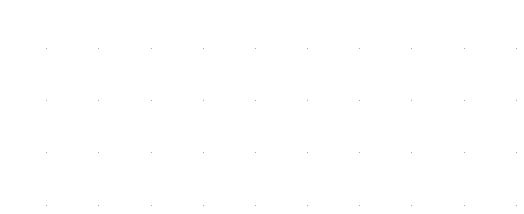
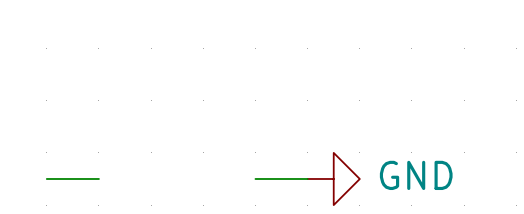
wire: none -> (46, 178) (98, 178)
wire: none -> (255, 178) (307, 178)
power symbol: none -> GND (333, 178)

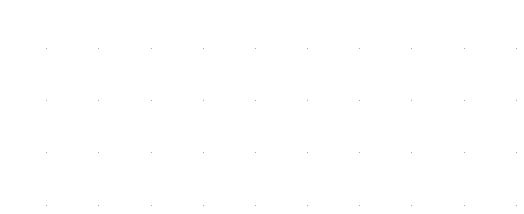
wire: (46, 178) (98, 178) -> none
wire: (255, 178) (307, 178) -> none
power symbol: GND (333, 178) -> none

